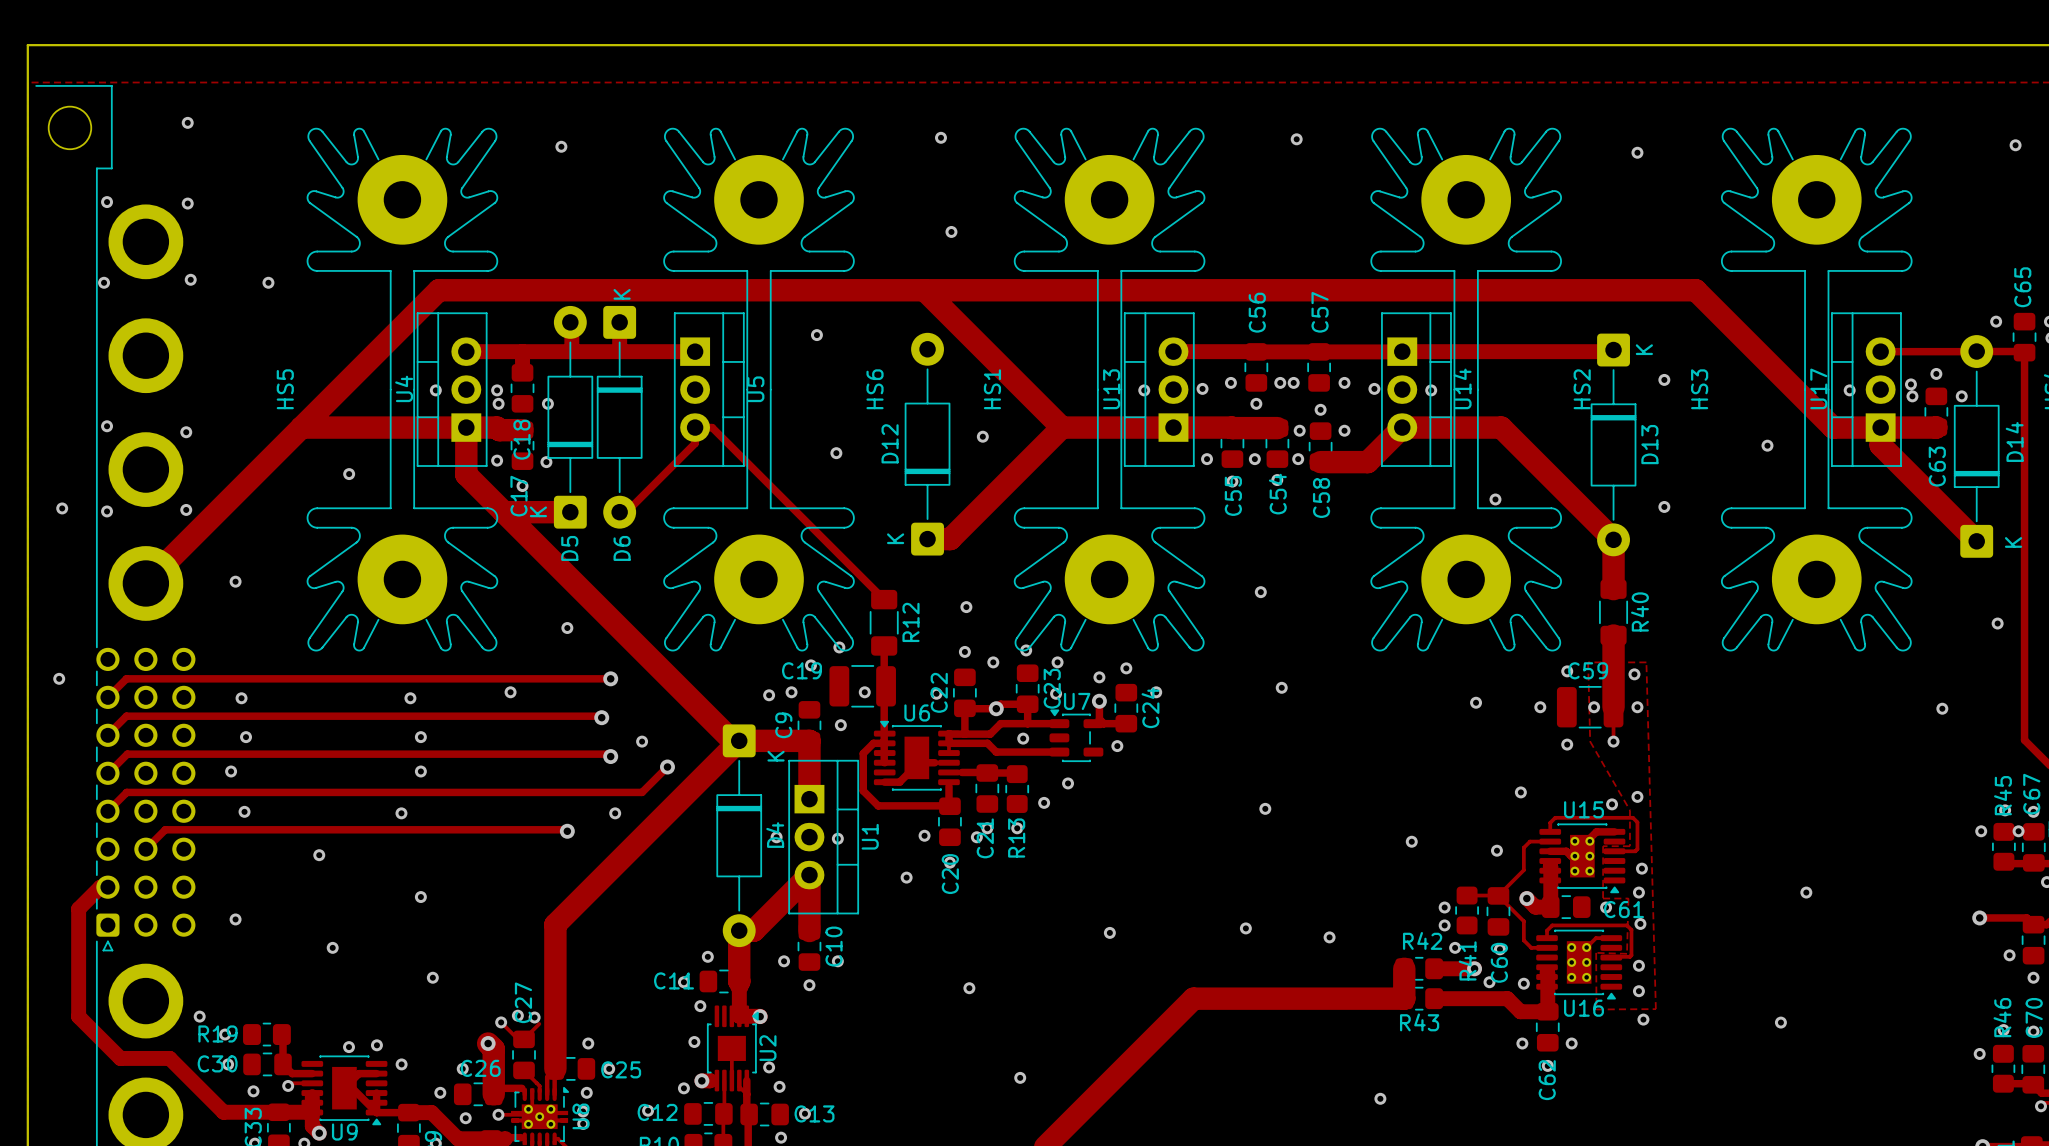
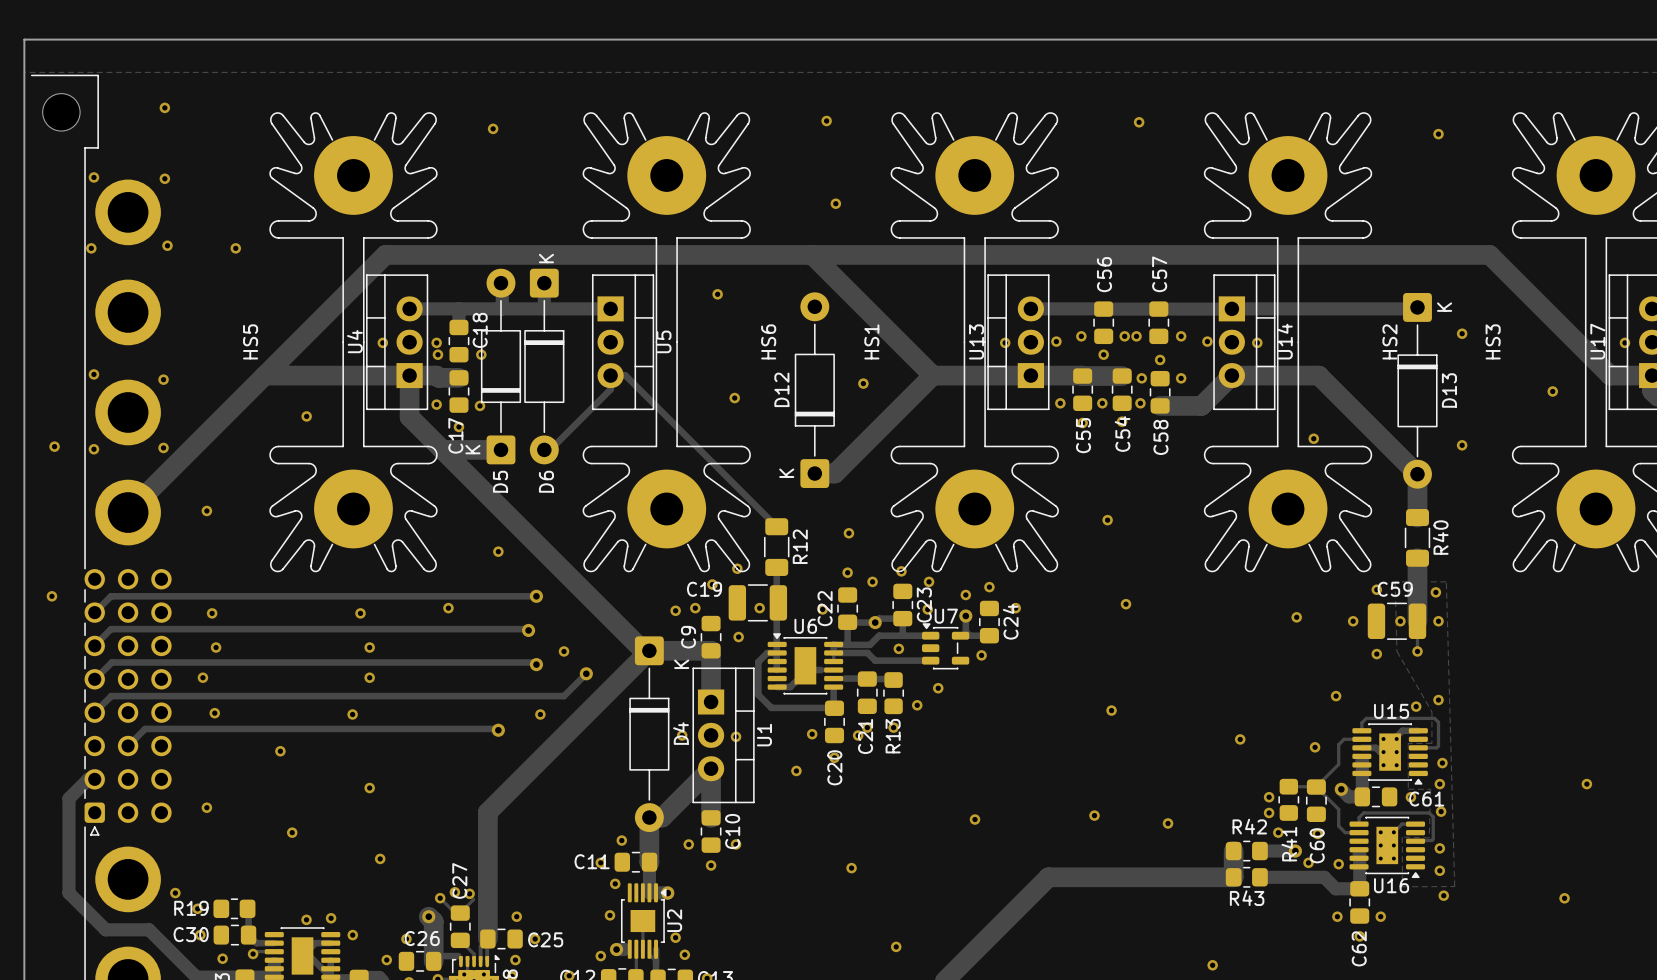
C18 name position: C18 (521, 439) -> C18 (480, 330)

